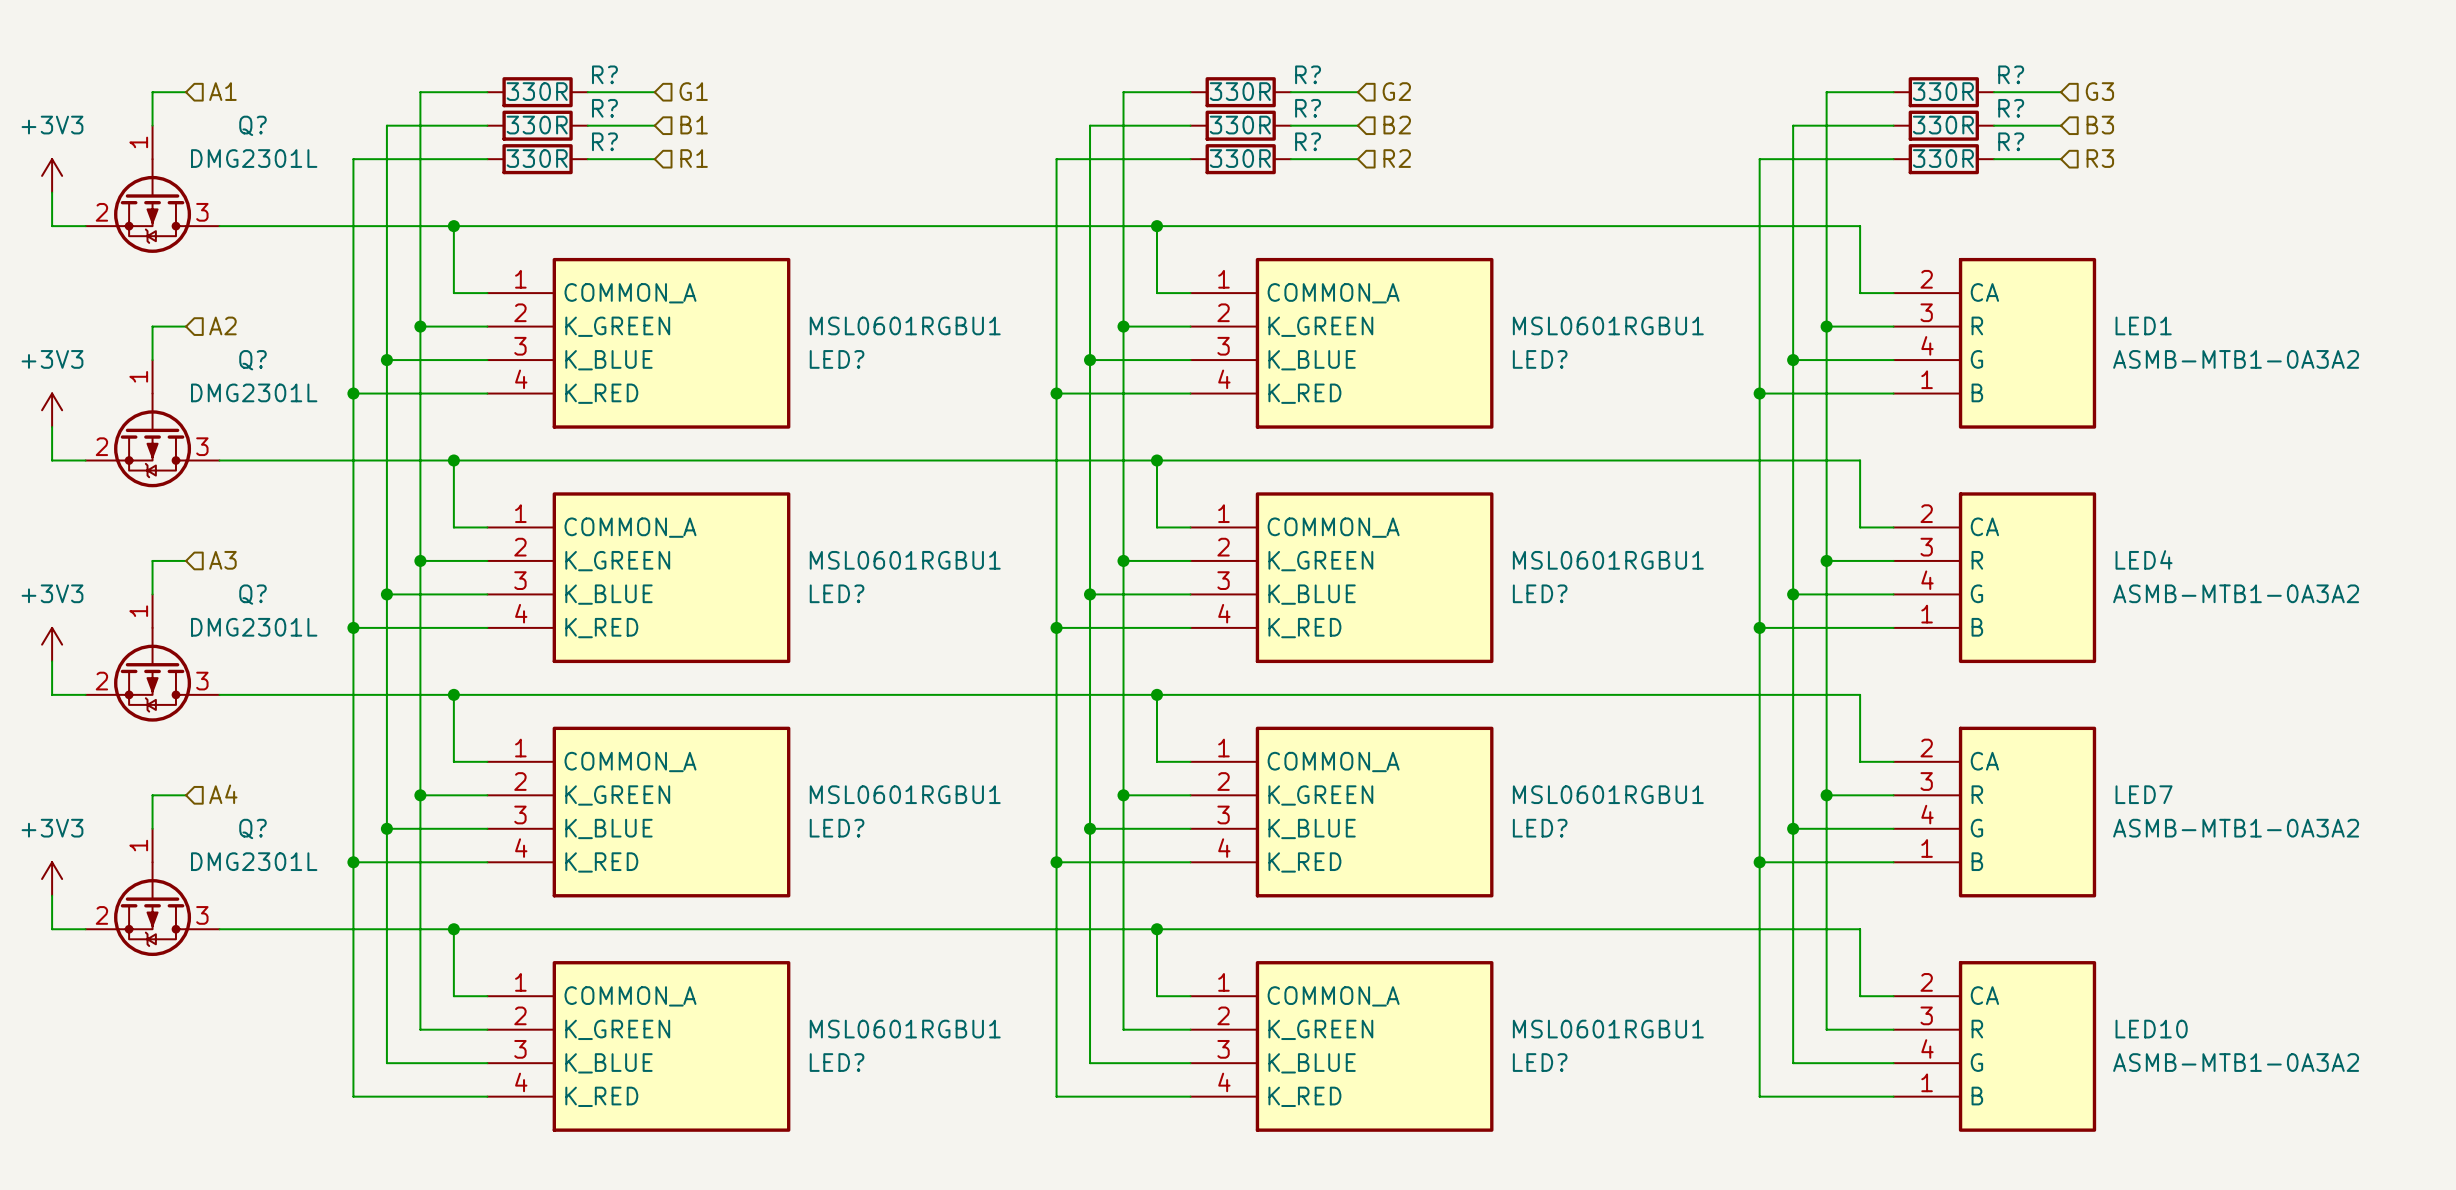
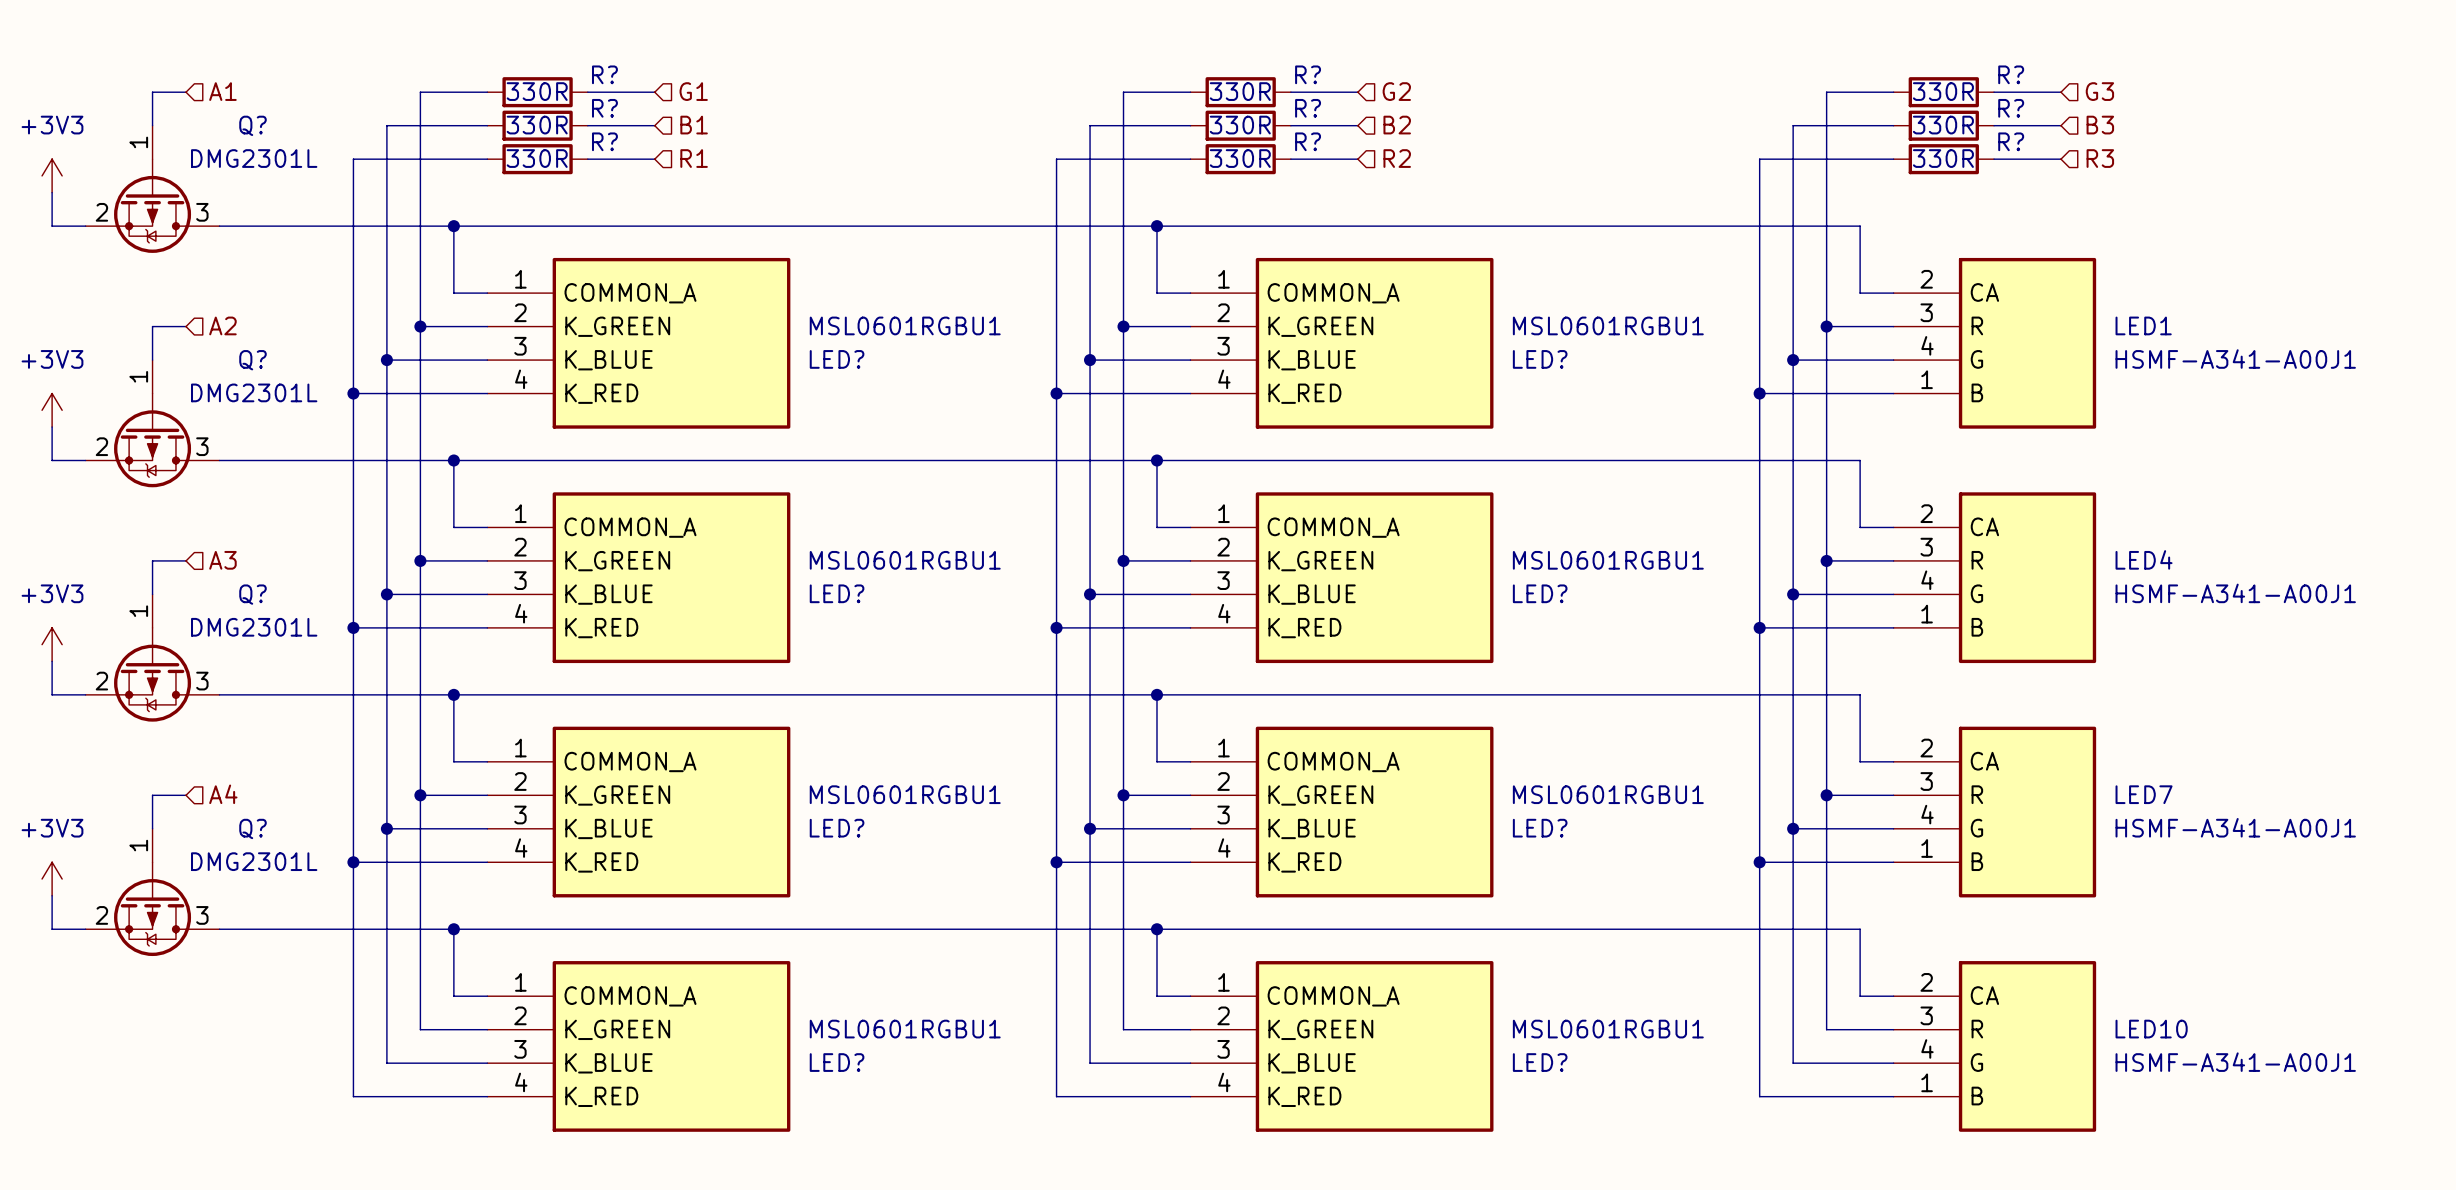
LED1 value: ASMB-MTB1-0A3A2 (2236, 359) -> HSMF-A341-A00J1 (2235, 359)
LED4 value: ASMB-MTB1-0A3A2 (2236, 593) -> HSMF-A341-A00J1 (2235, 593)
LED7 value: ASMB-MTB1-0A3A2 (2236, 828) -> HSMF-A341-A00J1 (2235, 827)
LED10 value: ASMB-MTB1-0A3A2 (2236, 1062) -> HSMF-A341-A00J1 (2235, 1062)

